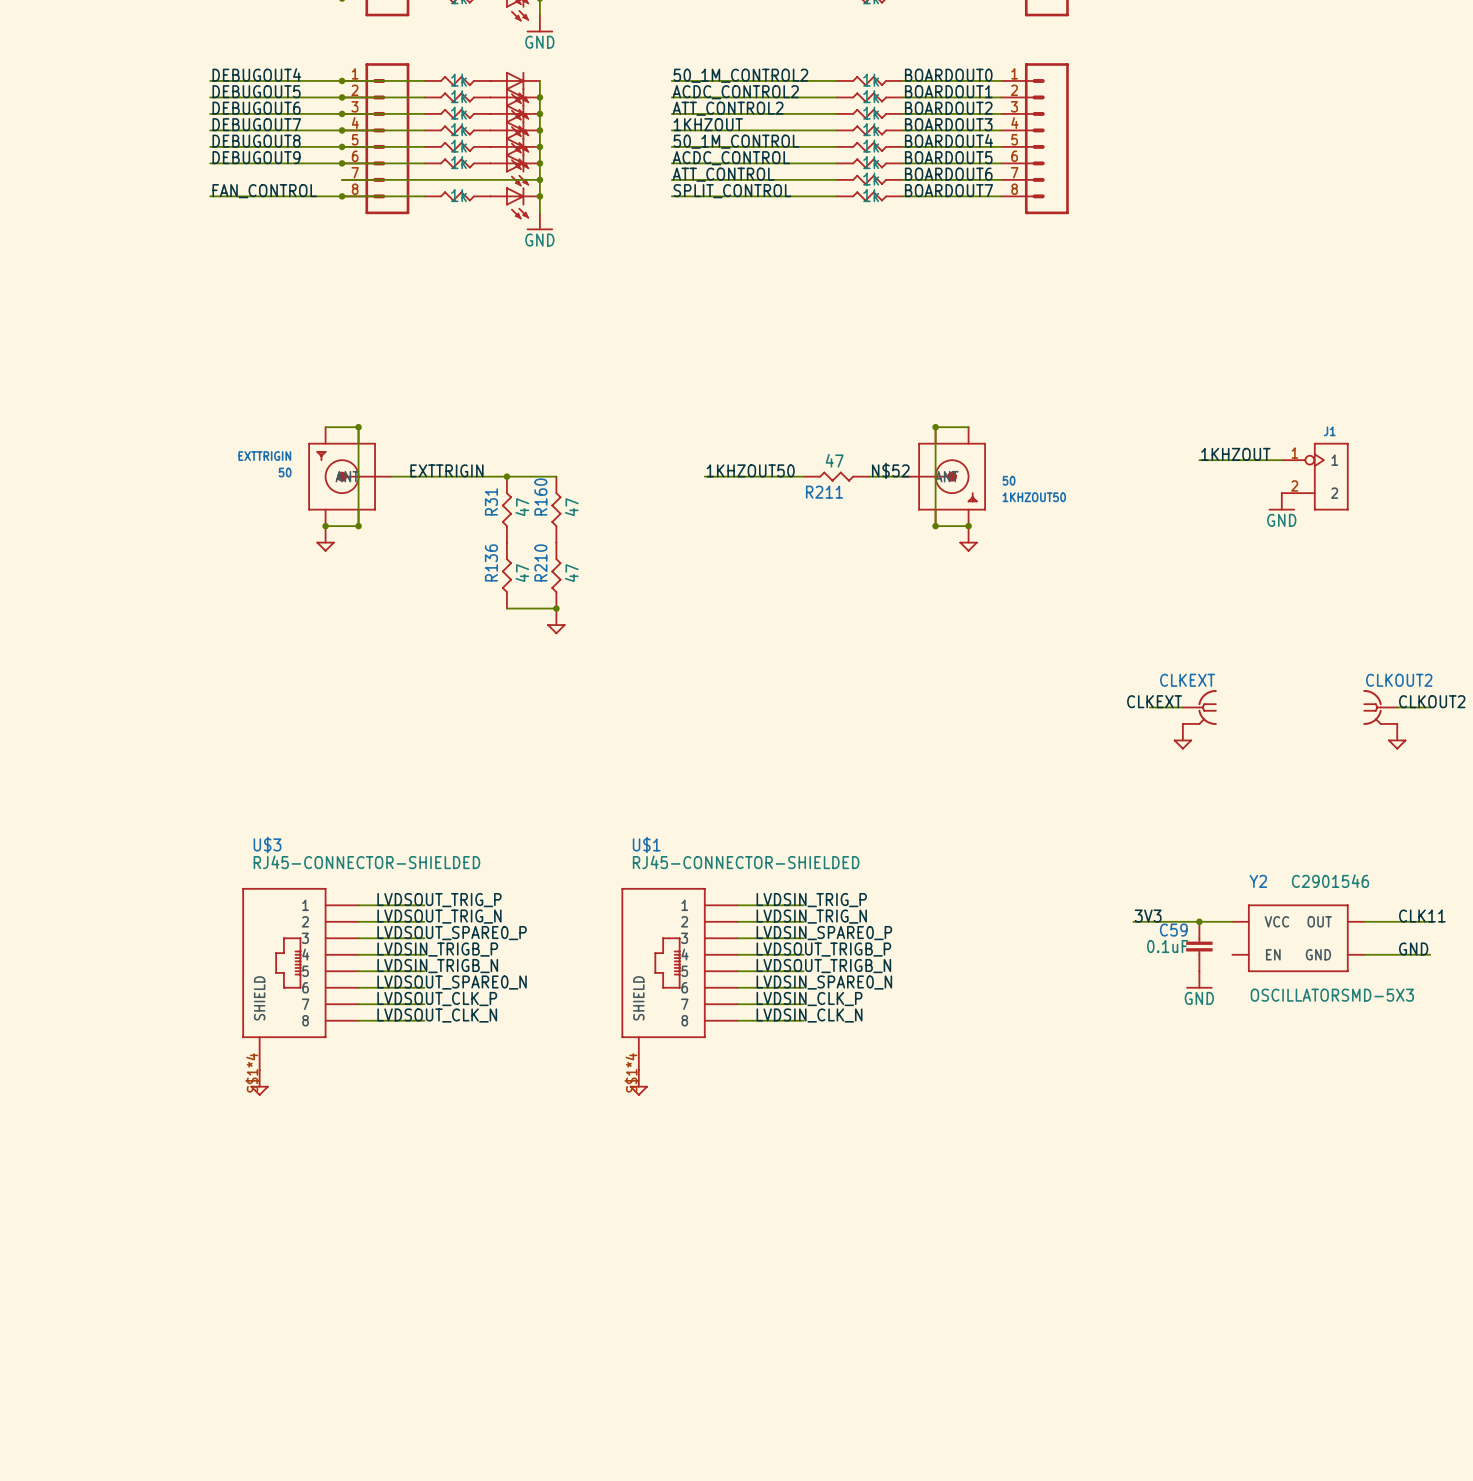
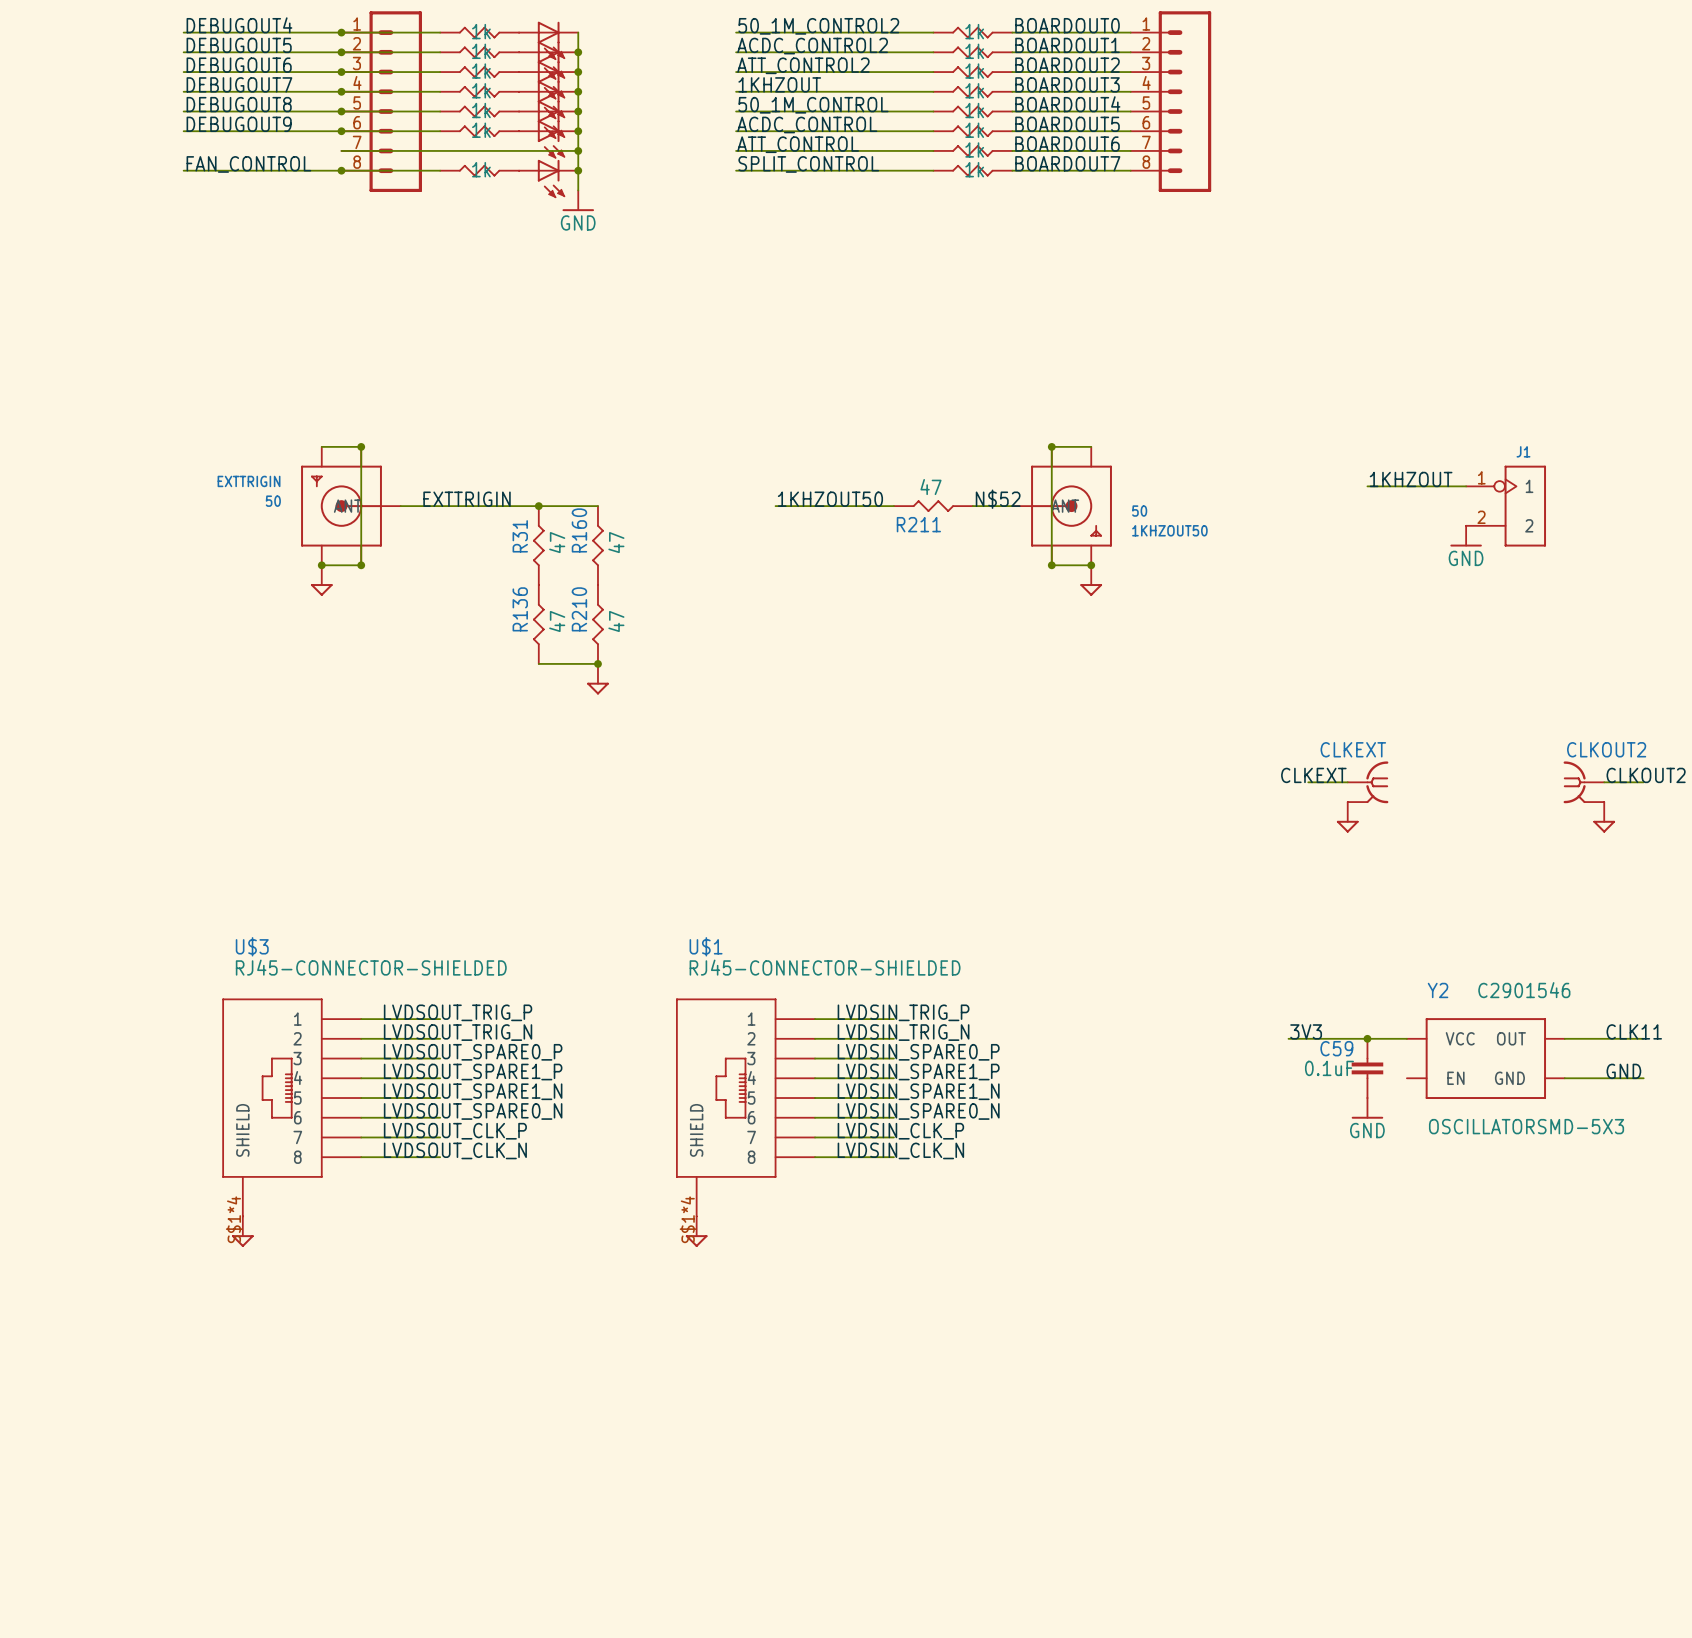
label: LVDSIN_TRIGB_P (437, 949) -> LVDSOUT_SPARE1_P (473, 1072)
label: LVDSOUT_TRIGB_P (823, 949) -> LVDSIN_SPARE1_P (918, 1072)
label: LVDSIN_TRIGB_N (437, 966) -> LVDSOUT_SPARE1_N (473, 1091)
label: LVDSOUT_TRIGB_N (823, 966) -> LVDSIN_SPARE1_N (918, 1091)

